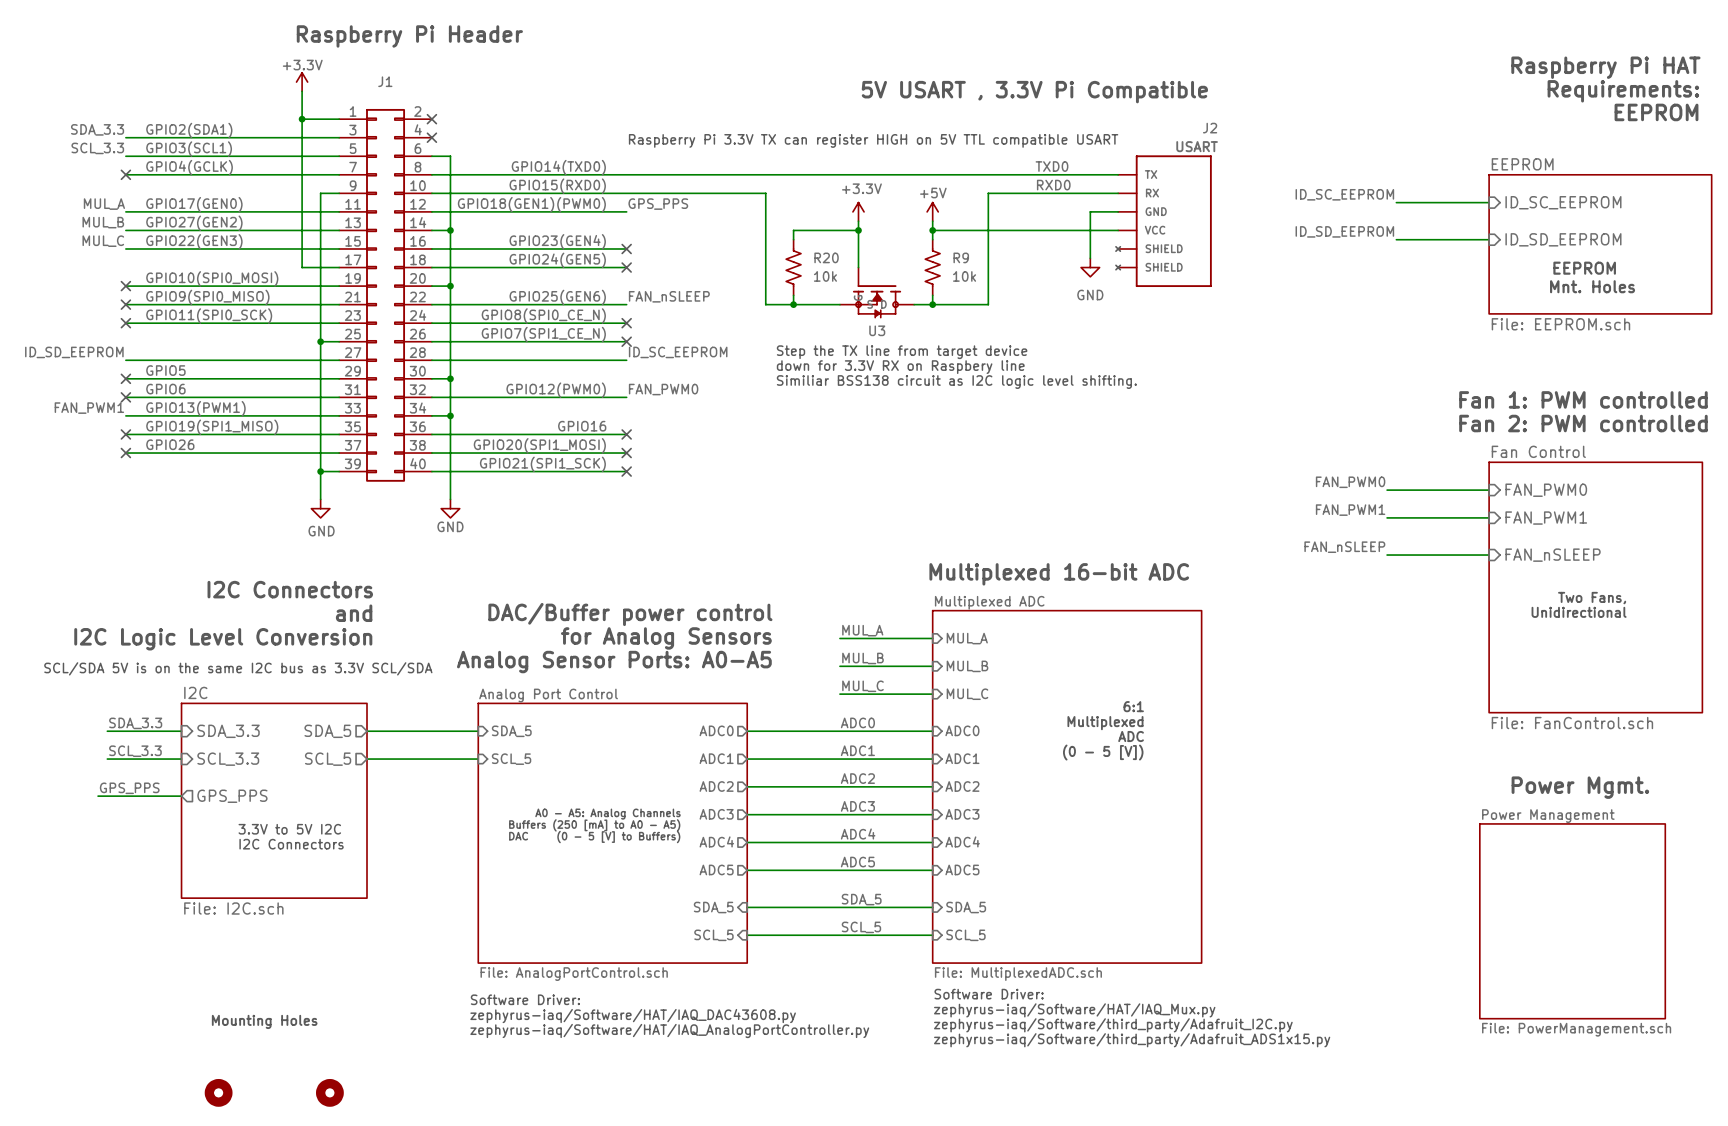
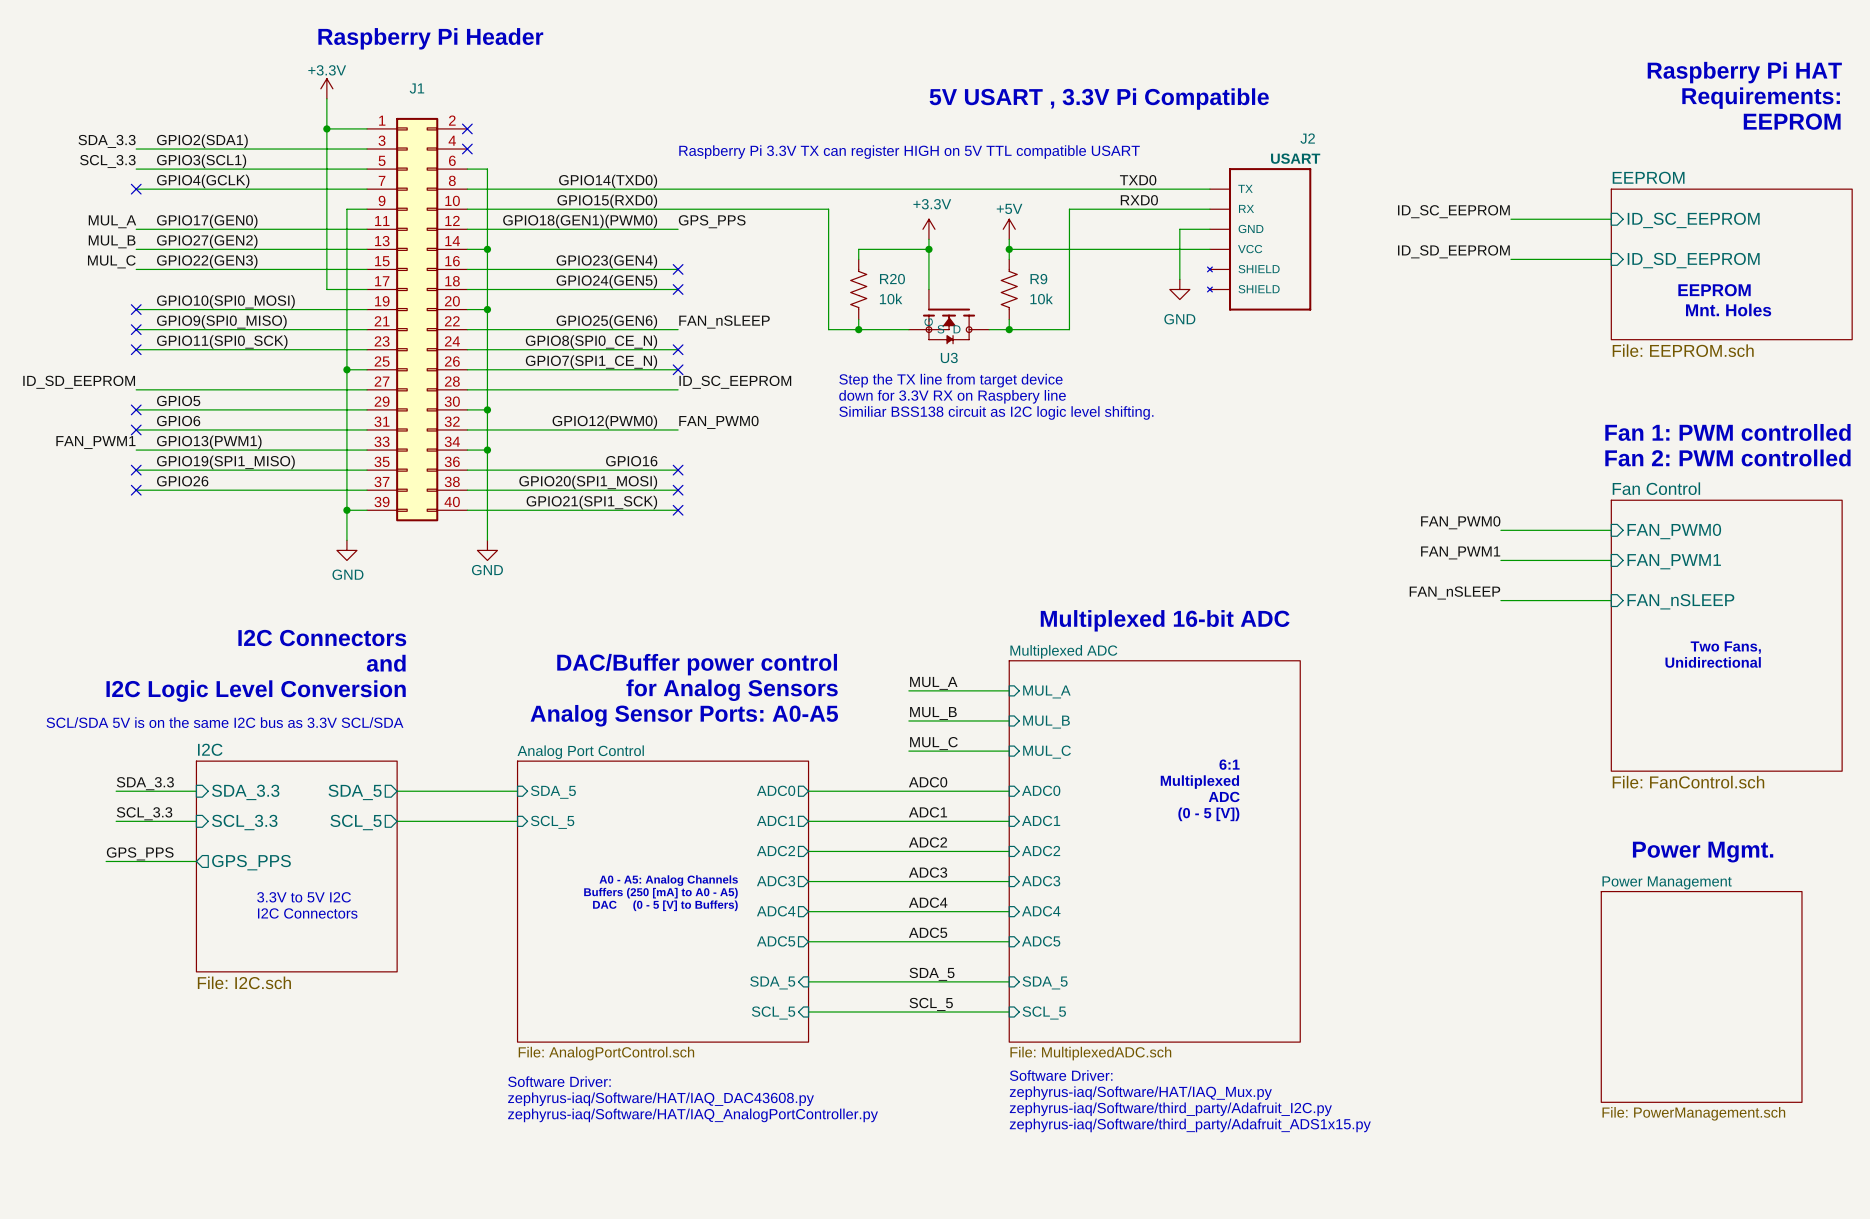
text: Mounting Holes (264, 1021) -> none
part: (218, 1092) -> none
part: (329, 1092) -> none

